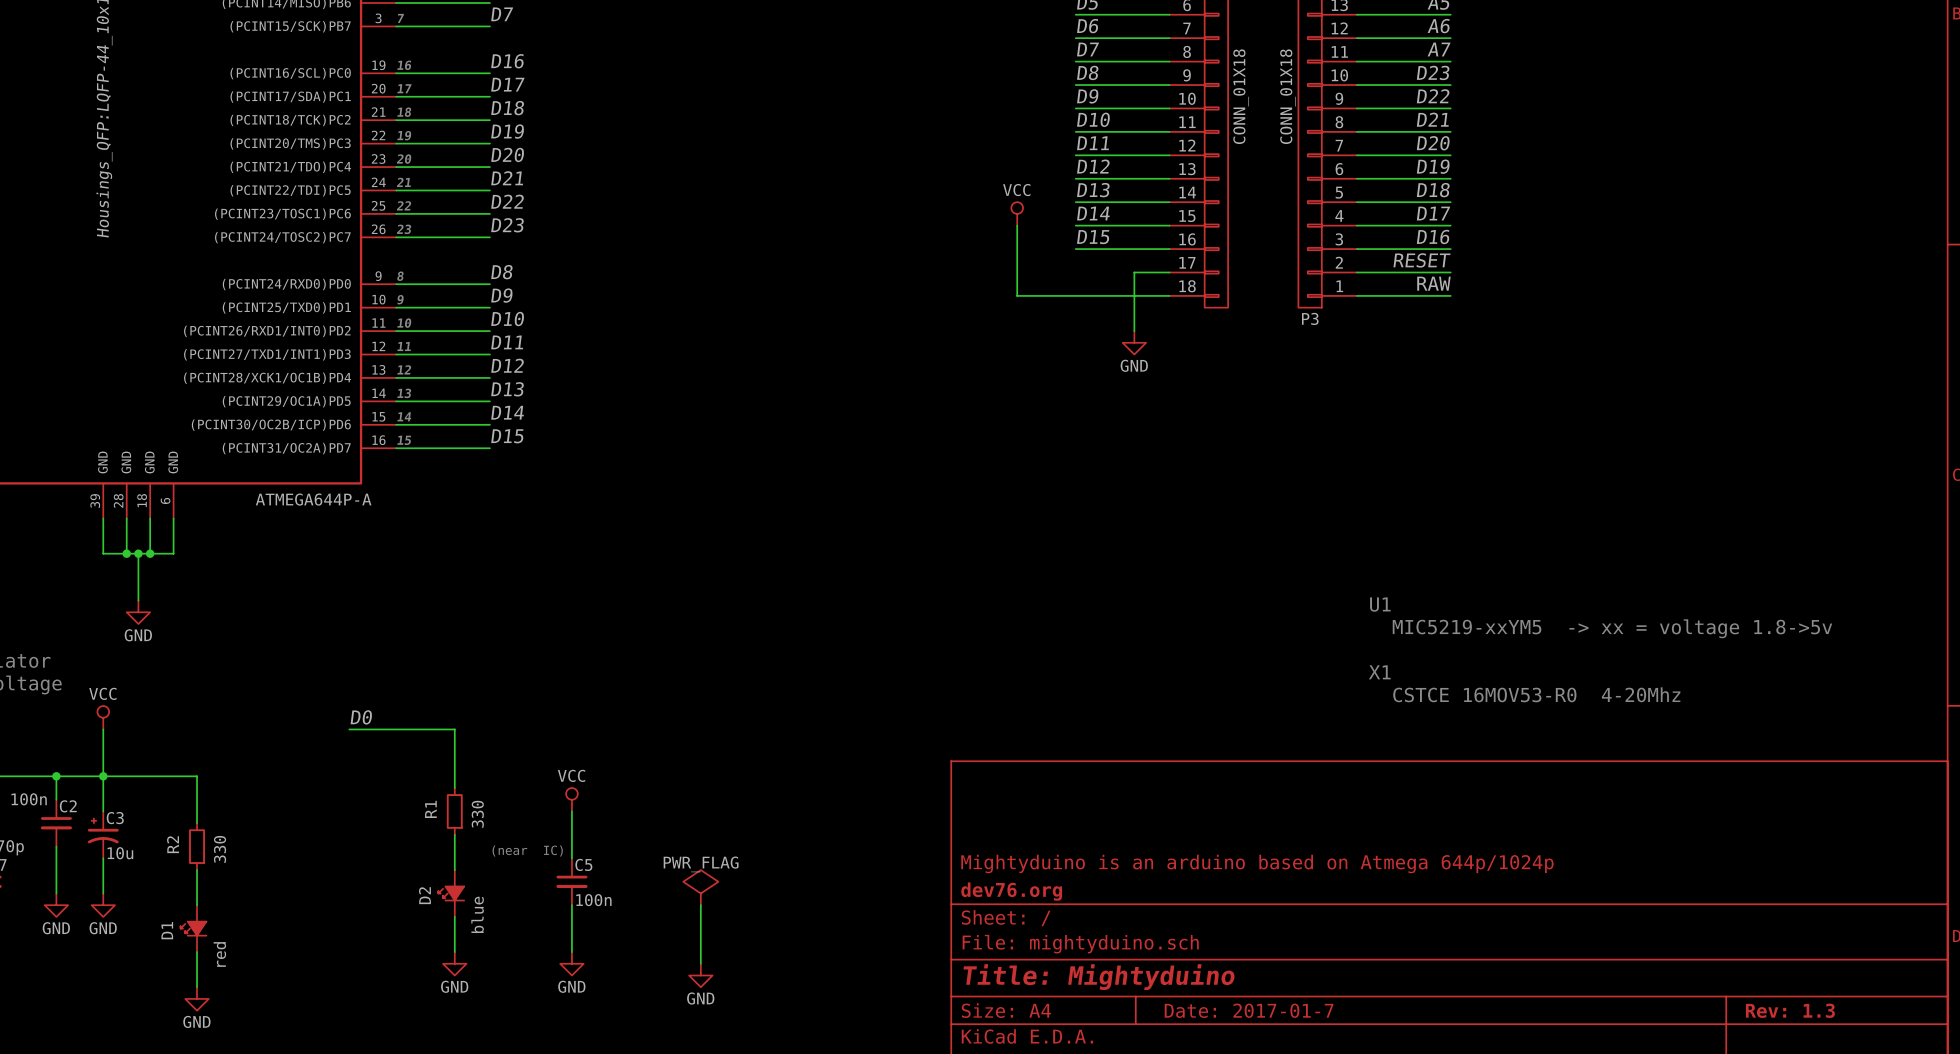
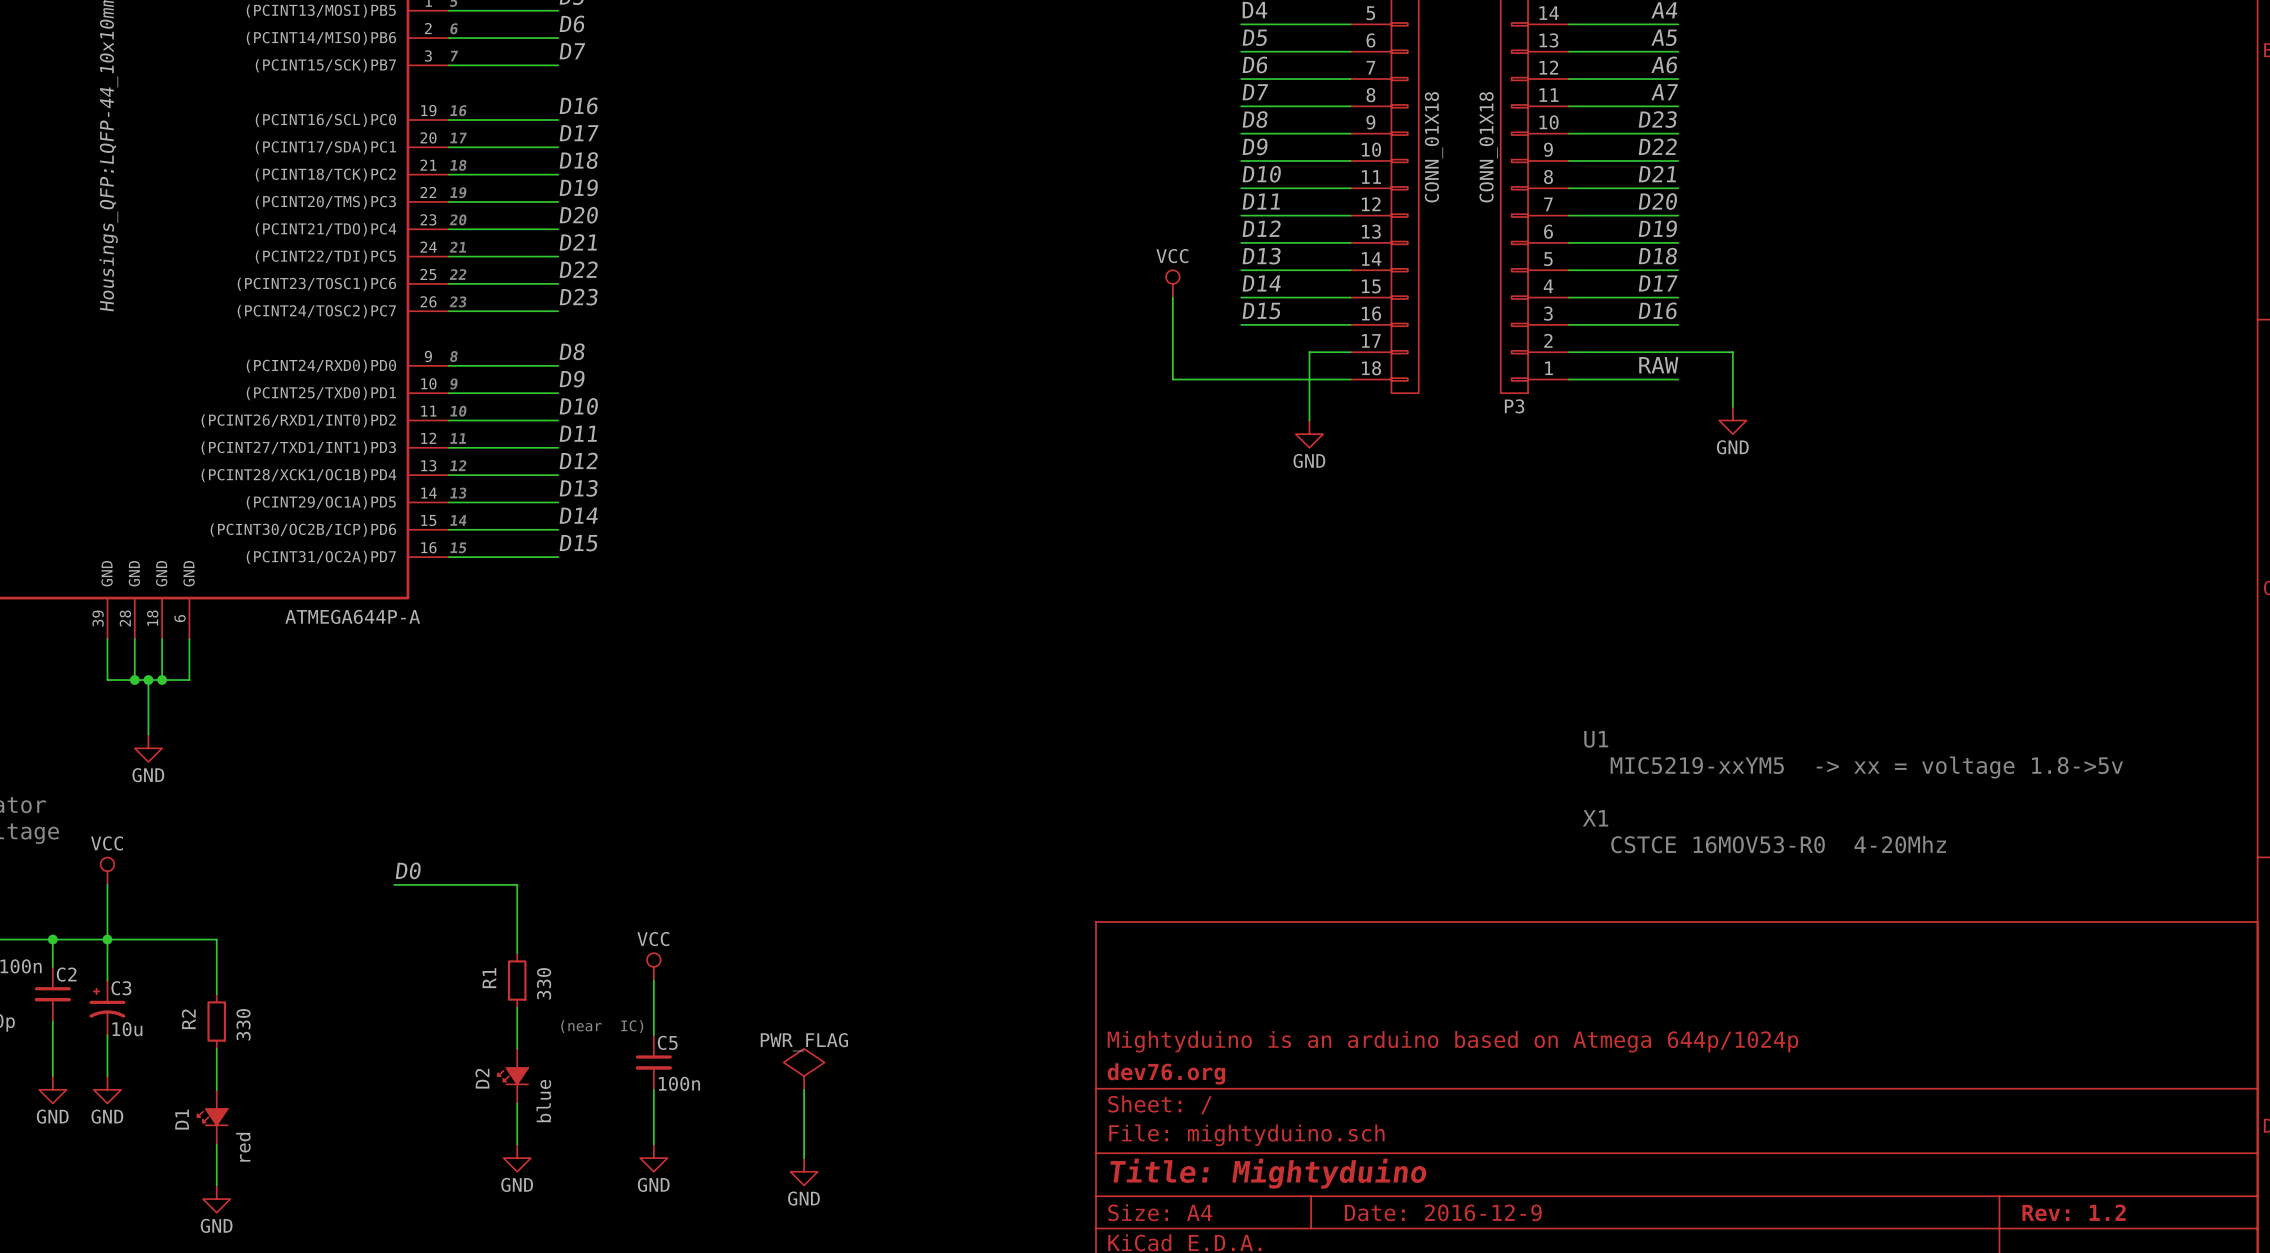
label: RESET (1421, 260) -> none
wire: none -> (1678, 352) (1732, 352) (1732, 406)
power symbol: none -> GND (1732, 420)
title block: Date: 2017-01-7 (1249, 1010) -> Date: 2016-12-9 (1443, 1212)
title block: Rev: 1.3 (1790, 1010) -> Rev: 1.2 (2074, 1212)

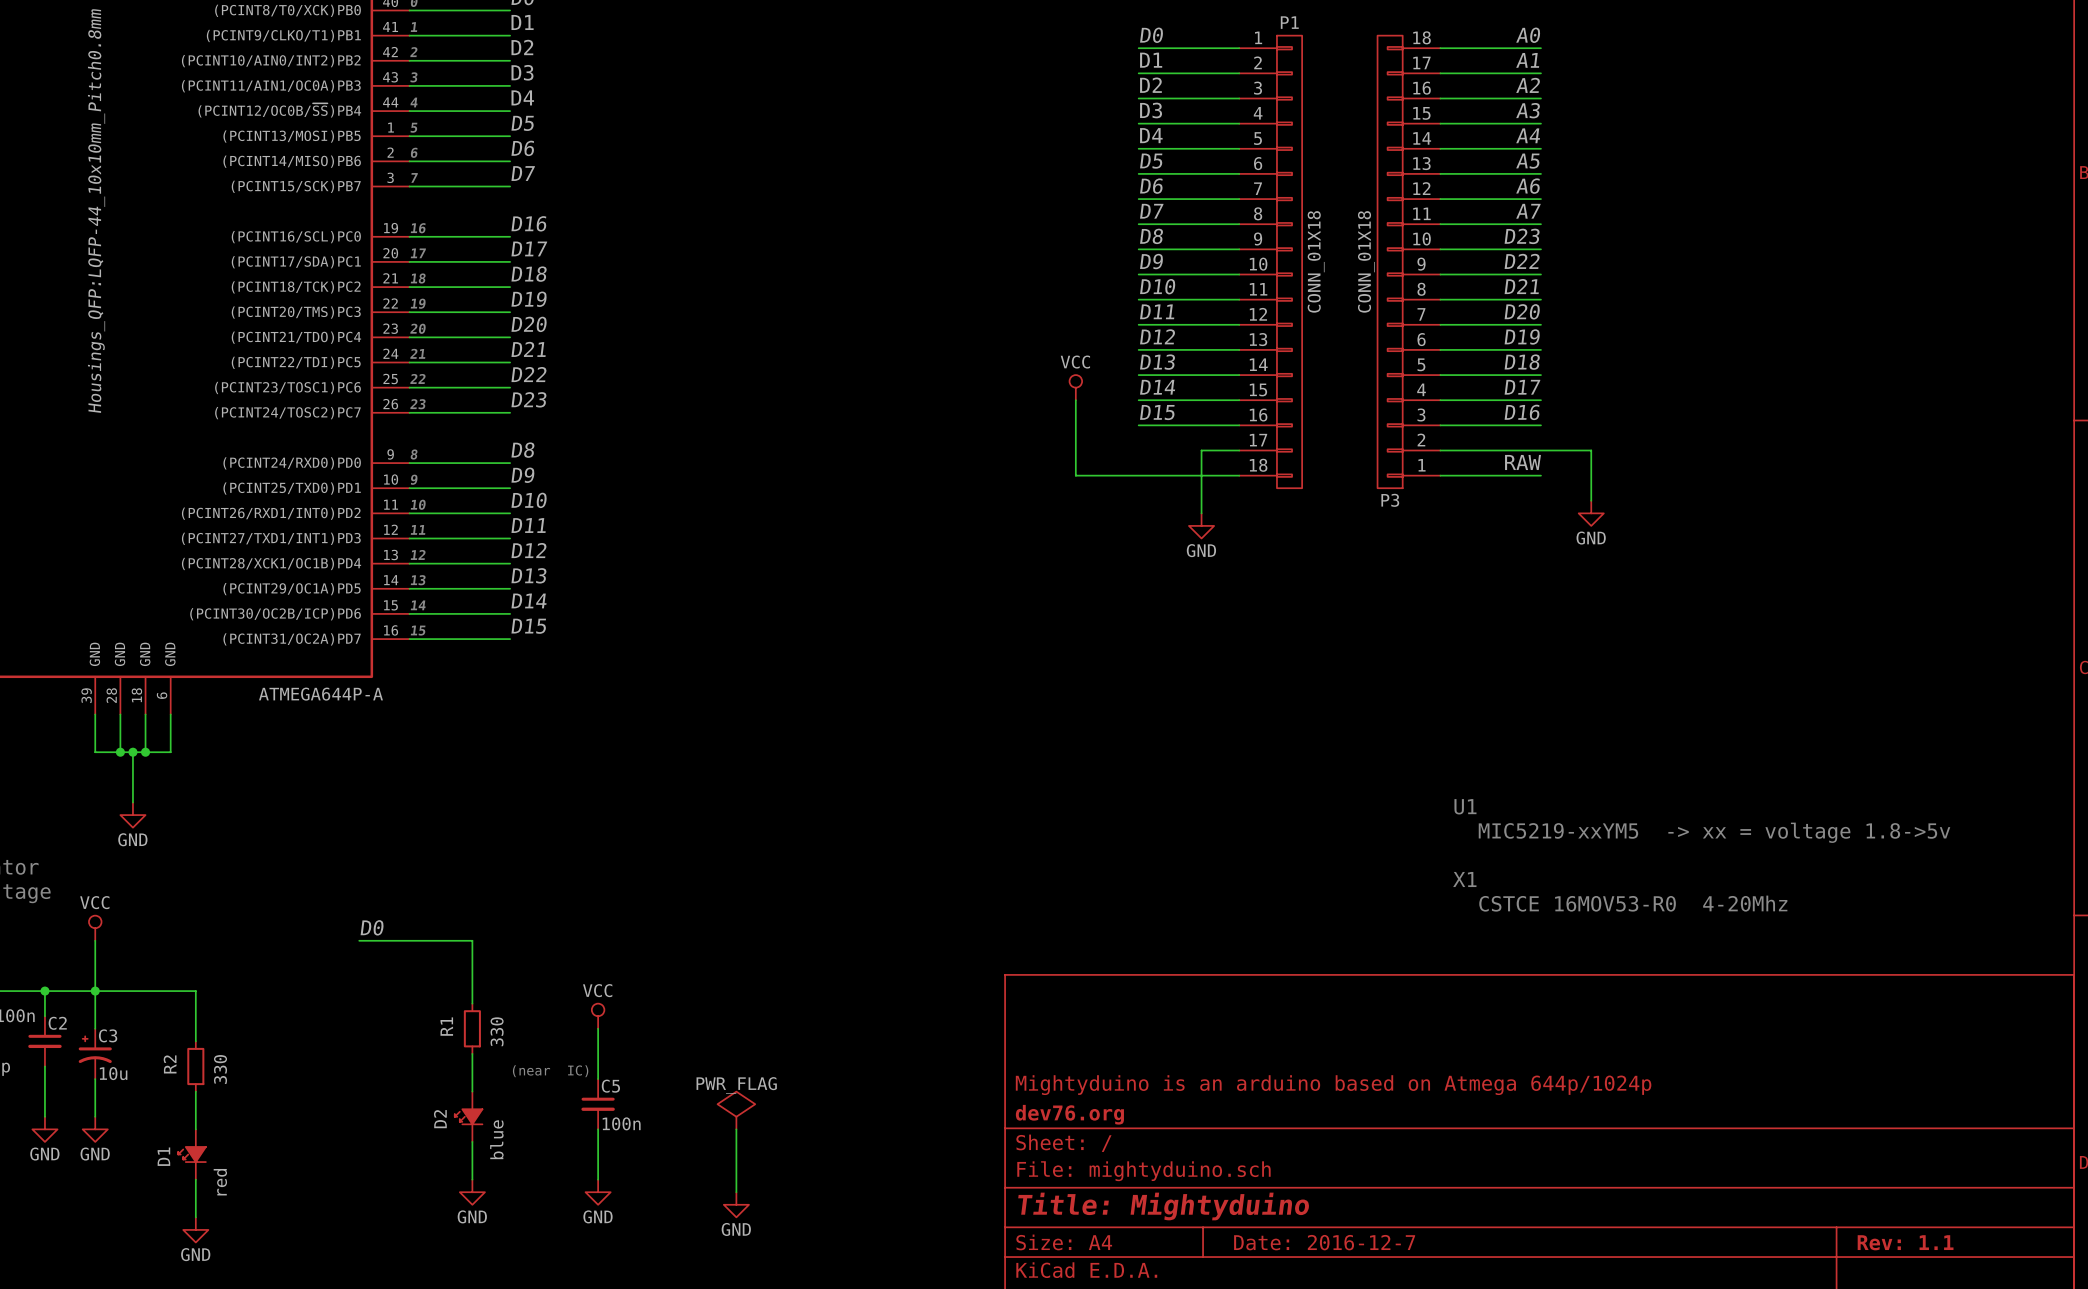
title block: Date: 2016-12-9 (1443, 1212) -> Date: 2016-12-7 (1324, 1242)
title block: Rev: 1.2 (2074, 1212) -> Rev: 1.1 (1905, 1242)

